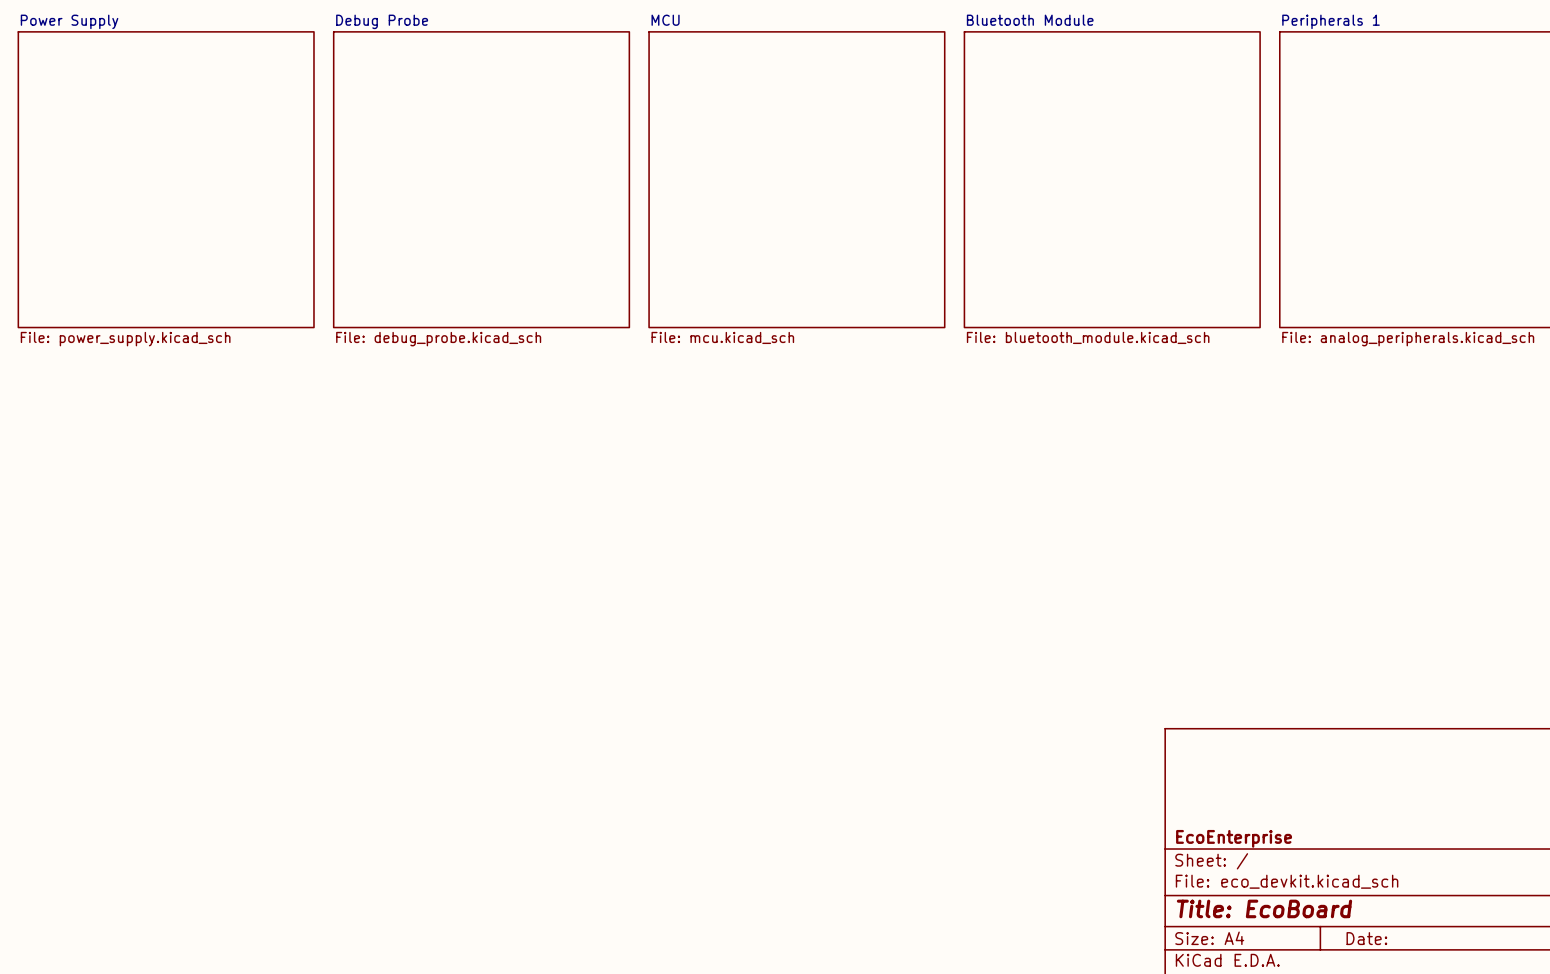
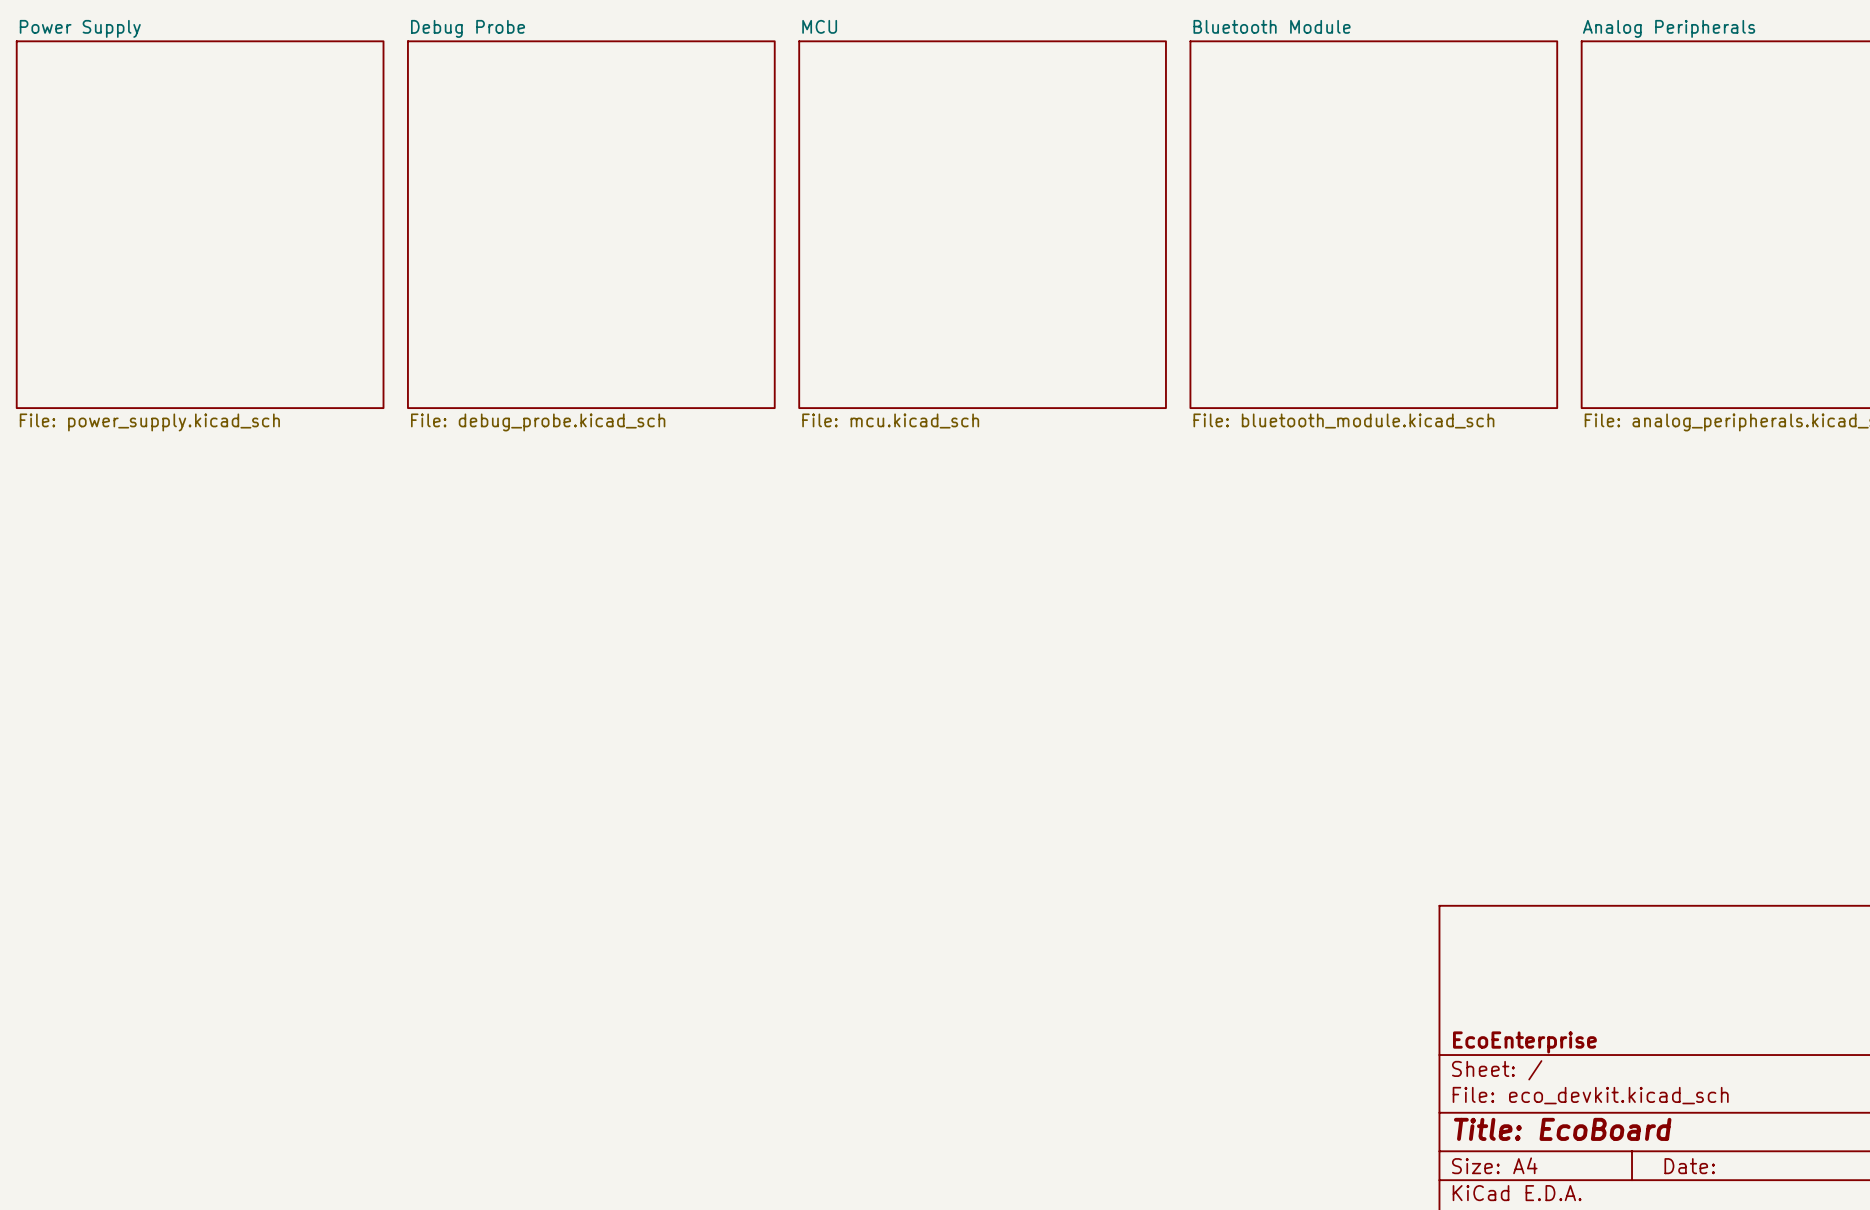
sheet Peripherals 1 name: Peripherals 1 (1331, 21) -> Analog Peripherals (1669, 28)

